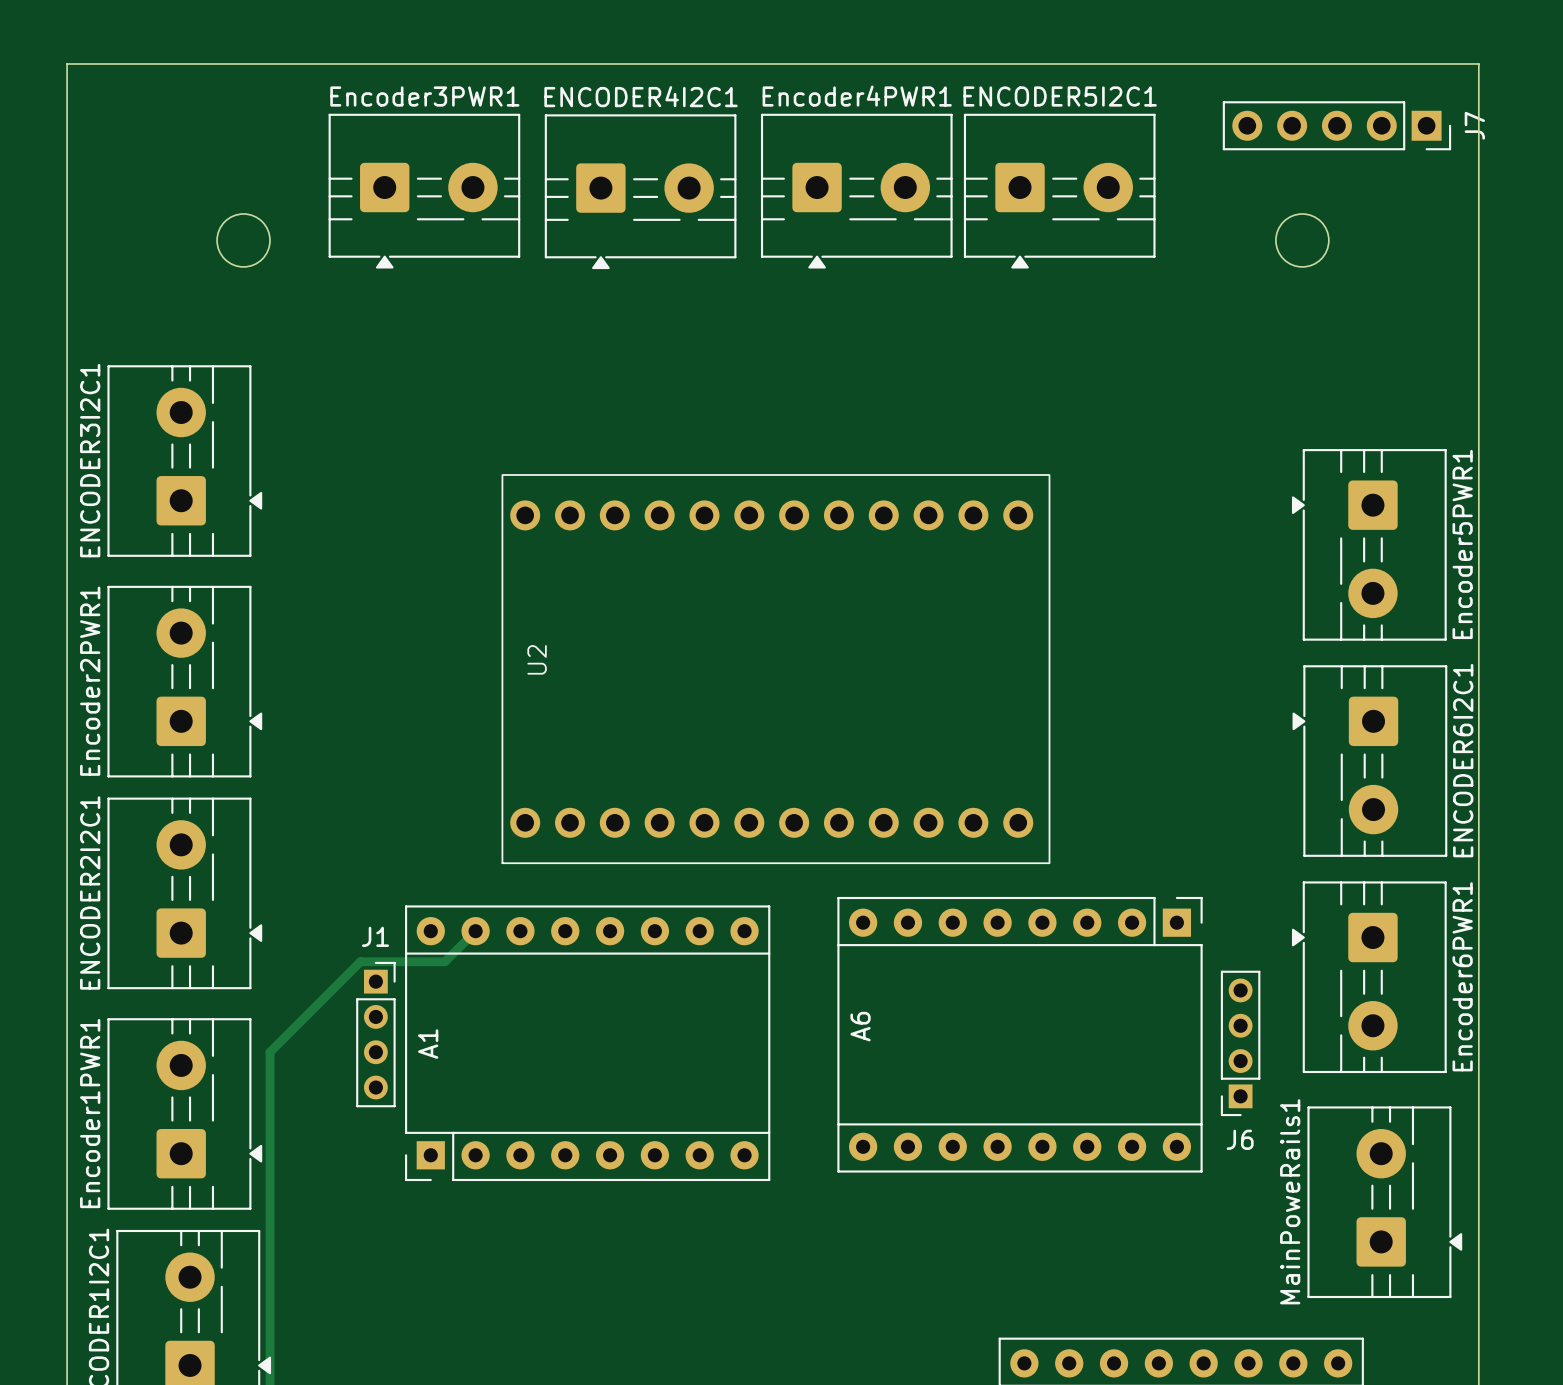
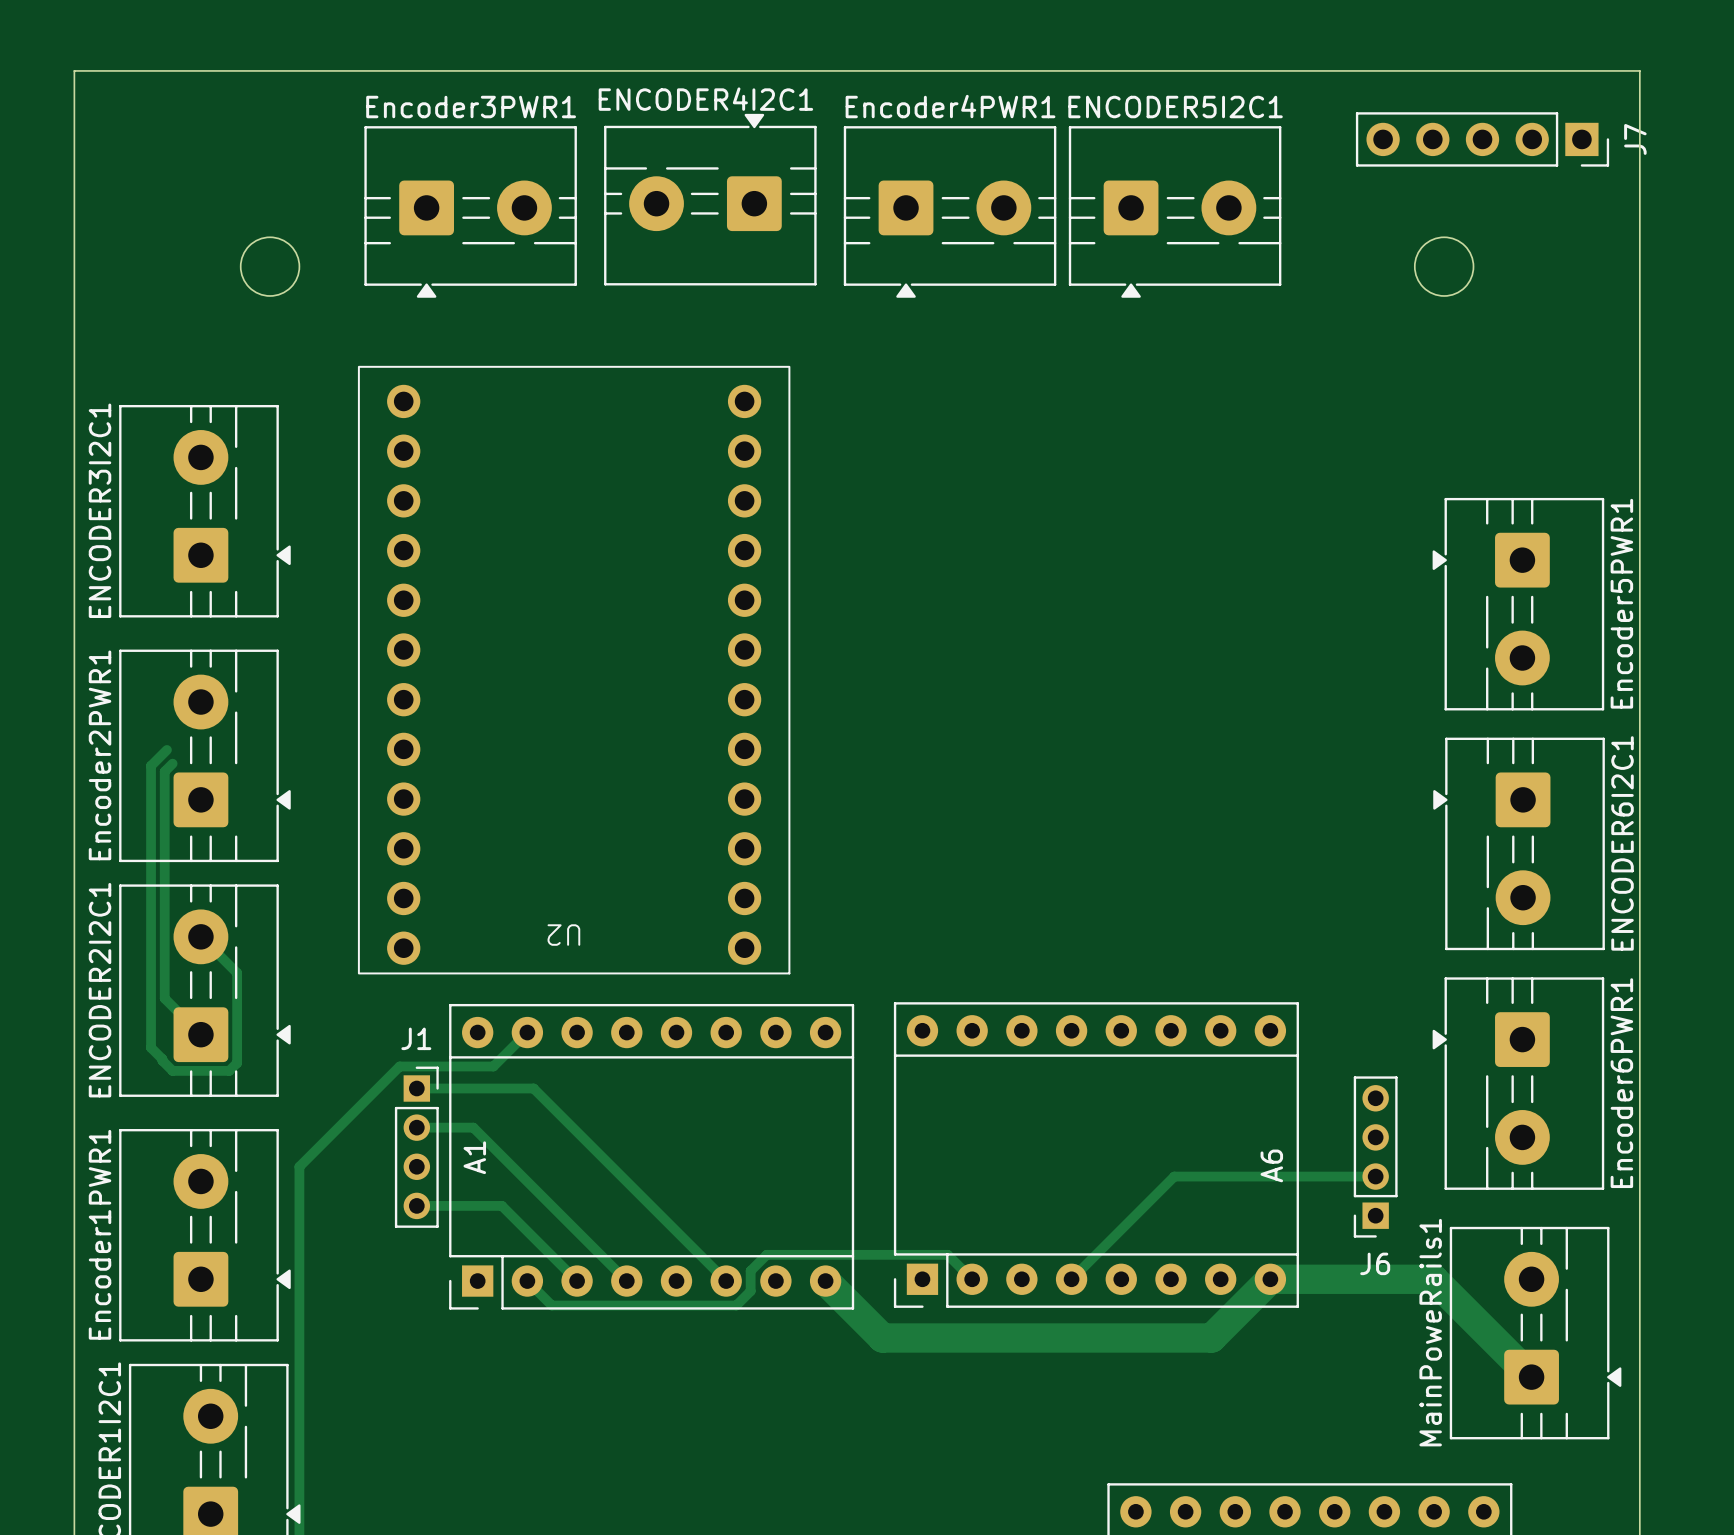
ENCODER4I2C1 rotation: 0° (640, 191) -> 180° (710, 199)
U2 rotation: 0° (775, 669) -> 90° counterclockwise (574, 670)
track: none -> (166, 749) (151, 765) (151, 1047) (172, 1070) (229, 1070) (237, 1063) (237, 973) (200, 936)
track: none -> (172, 763) (164, 771) (164, 998) (200, 1034)
track: none -> (416, 1088) (533, 1088) (726, 1281)
track: none -> (416, 1127) (473, 1127) (626, 1281)
A6 rotation: 0° (1020, 1034) -> 180° (1096, 1155)
track: none -> (1375, 1176) (1174, 1176) (1071, 1279)
track: none -> (416, 1205) (501, 1205) (577, 1281)
track: none -> (972, 1279) (947, 1254) (766, 1254) (750, 1270) (750, 1291) (736, 1305) (551, 1305) (527, 1281)
track: none -> (825, 1281) (882, 1337) (1211, 1337) (1270, 1279) (1433, 1279) (1531, 1377)

